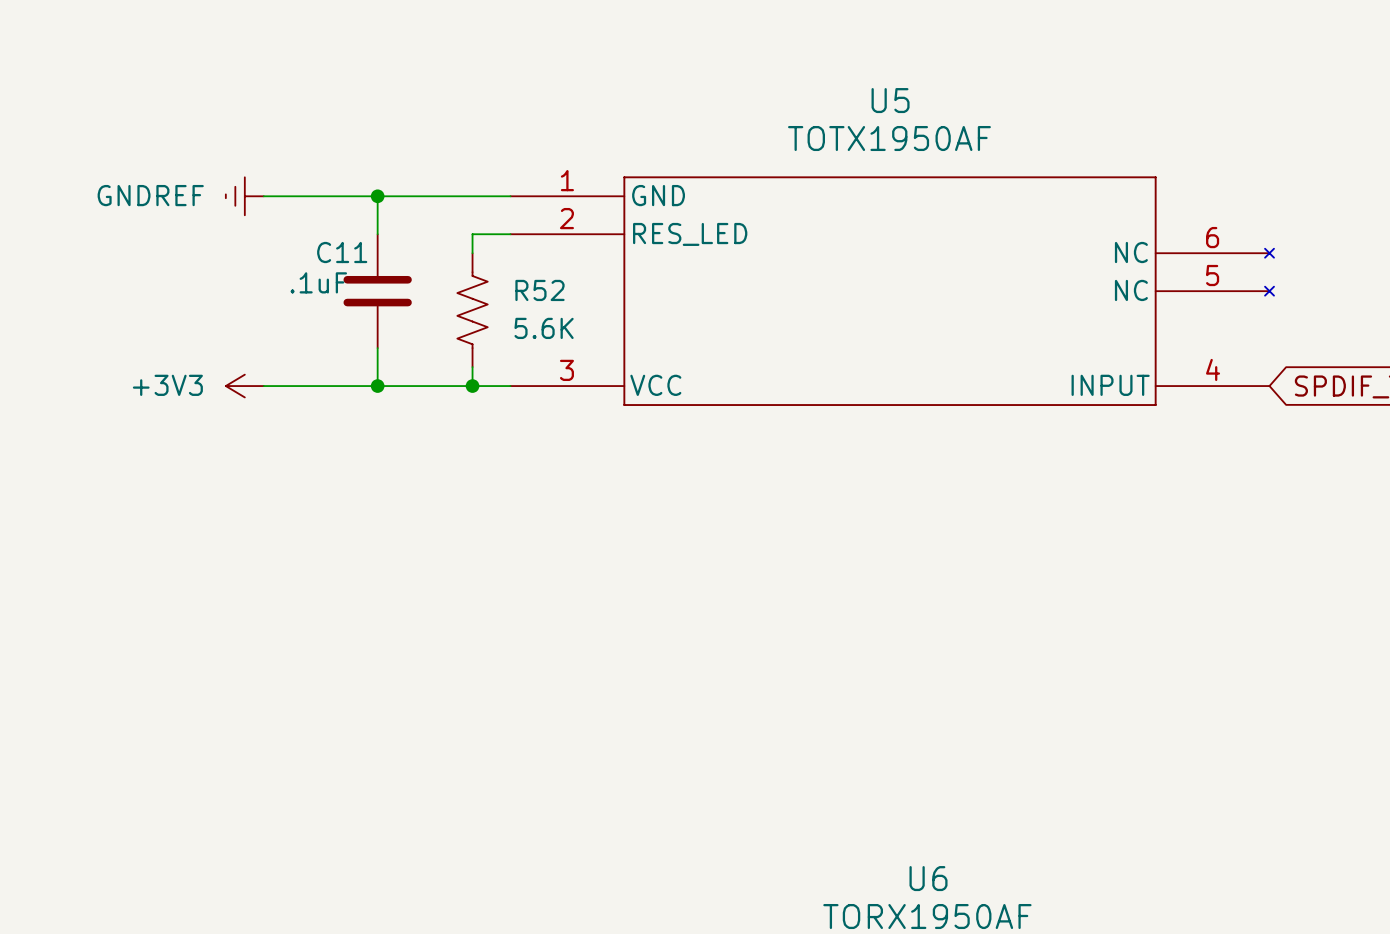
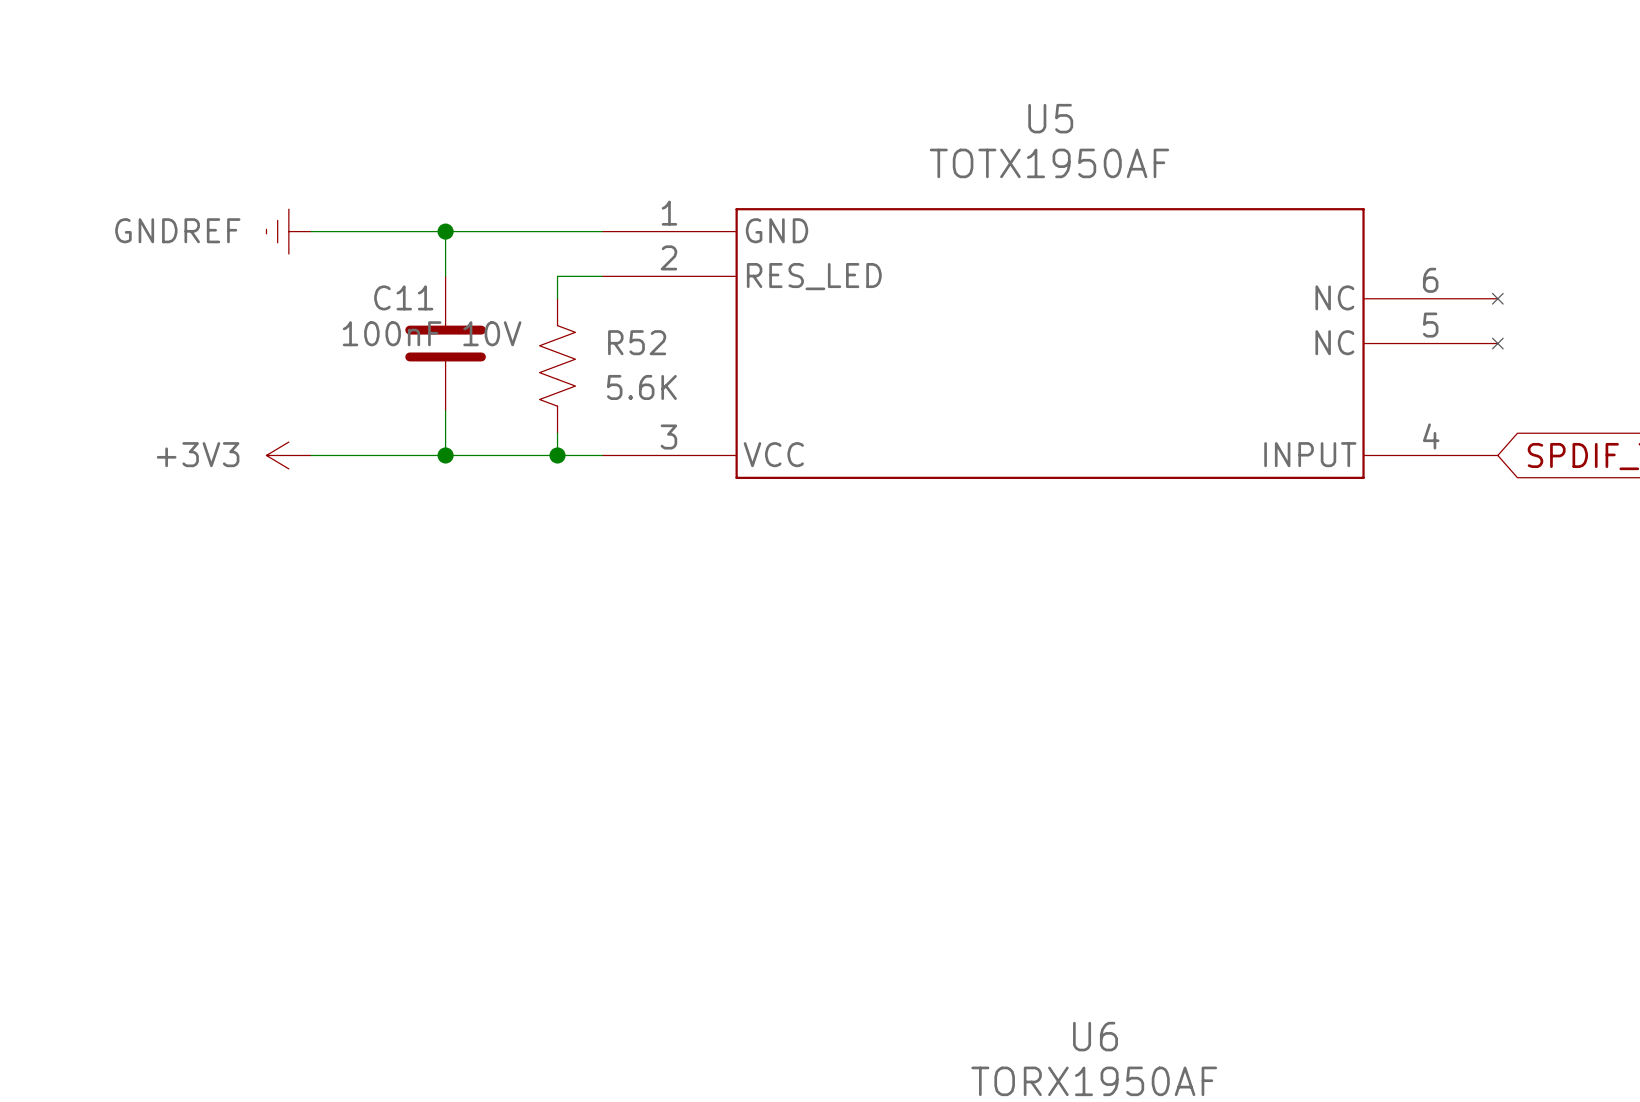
C11 value: .1uF (318, 282) -> 100nF 10V (432, 333)

